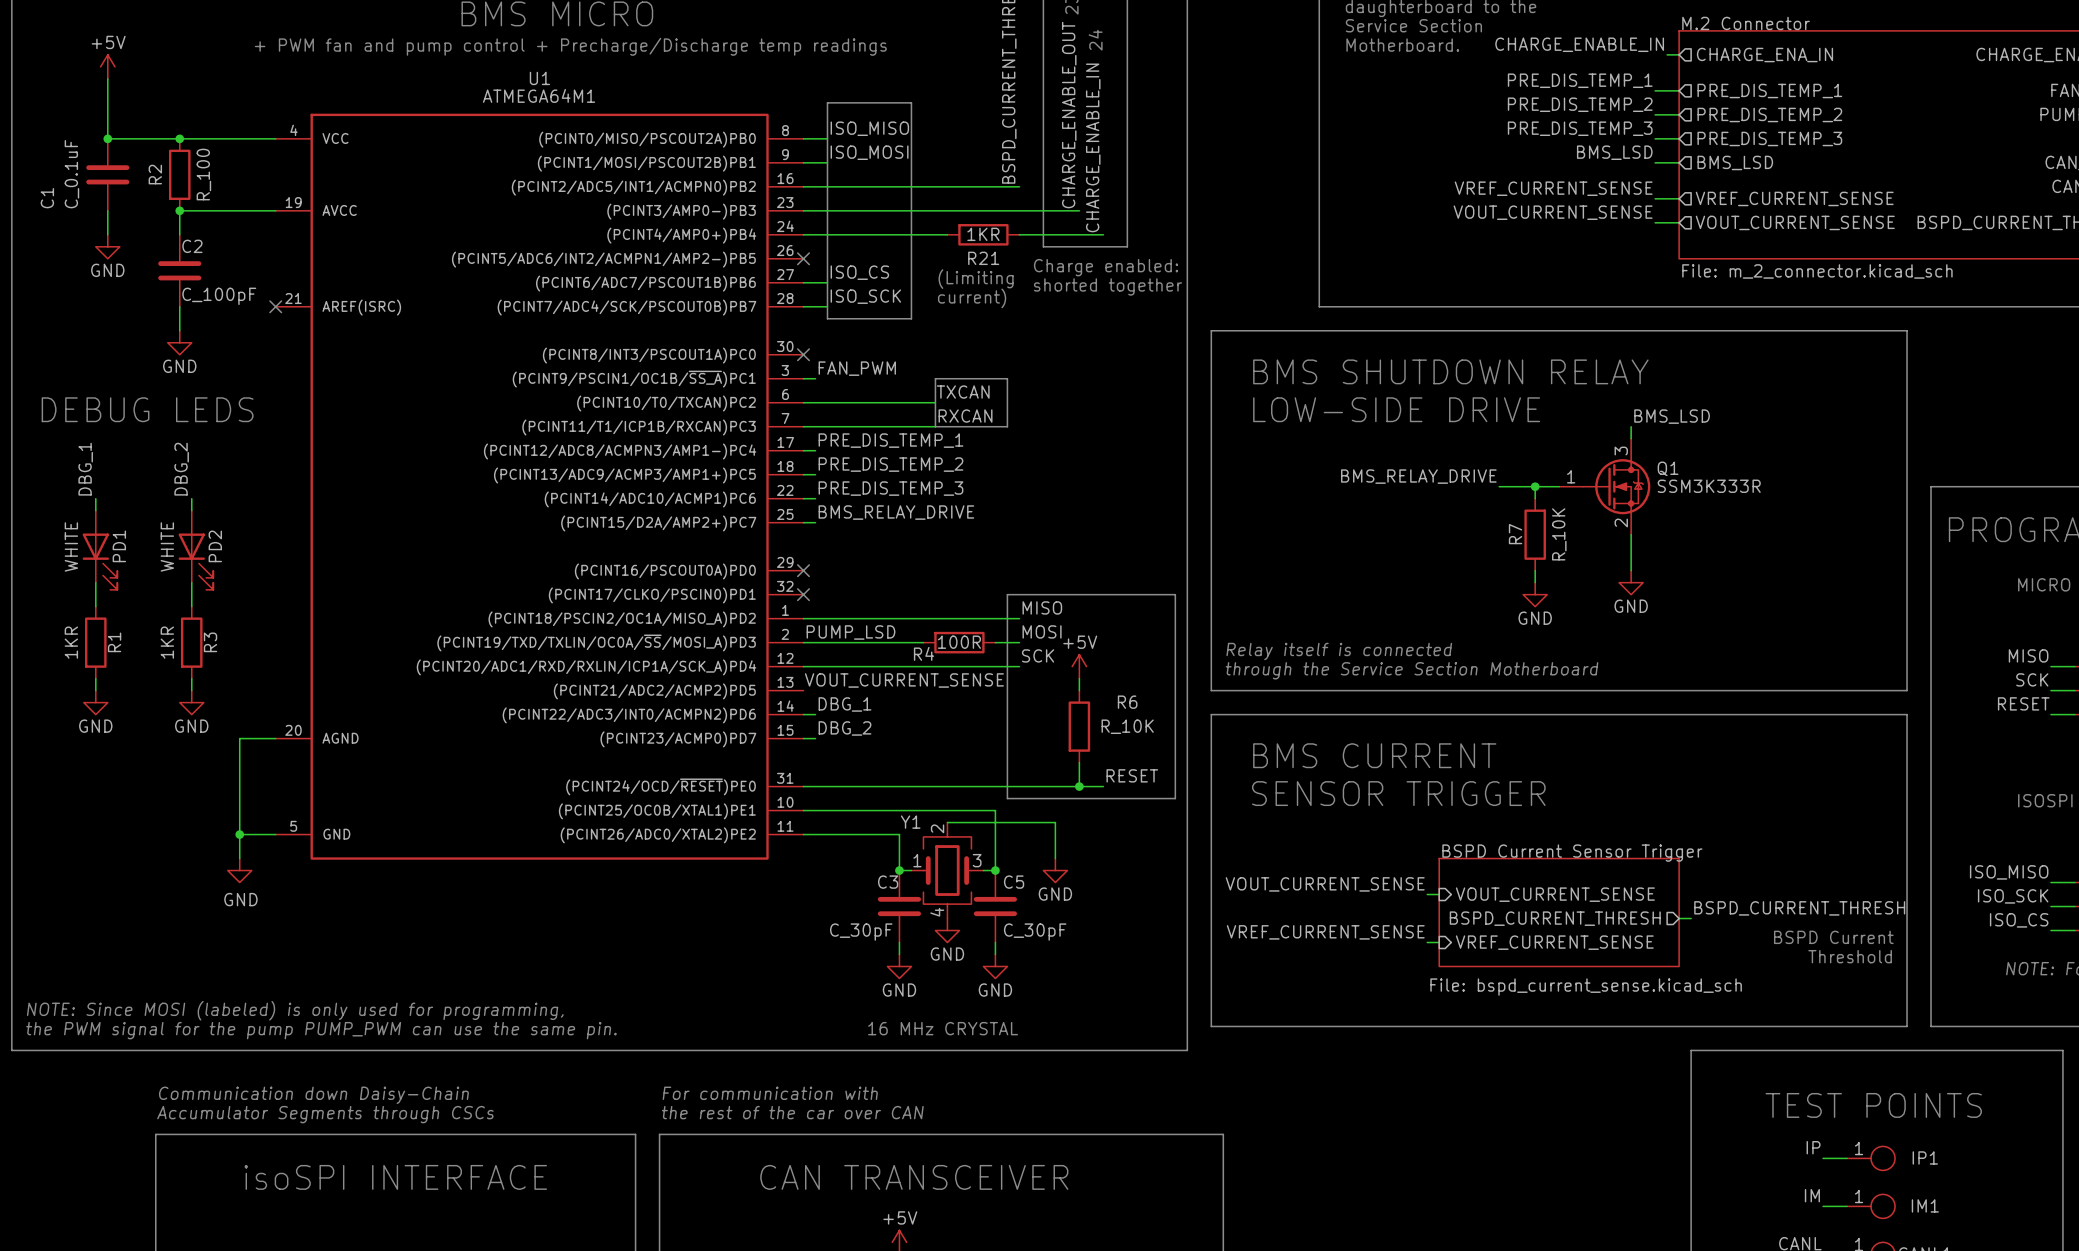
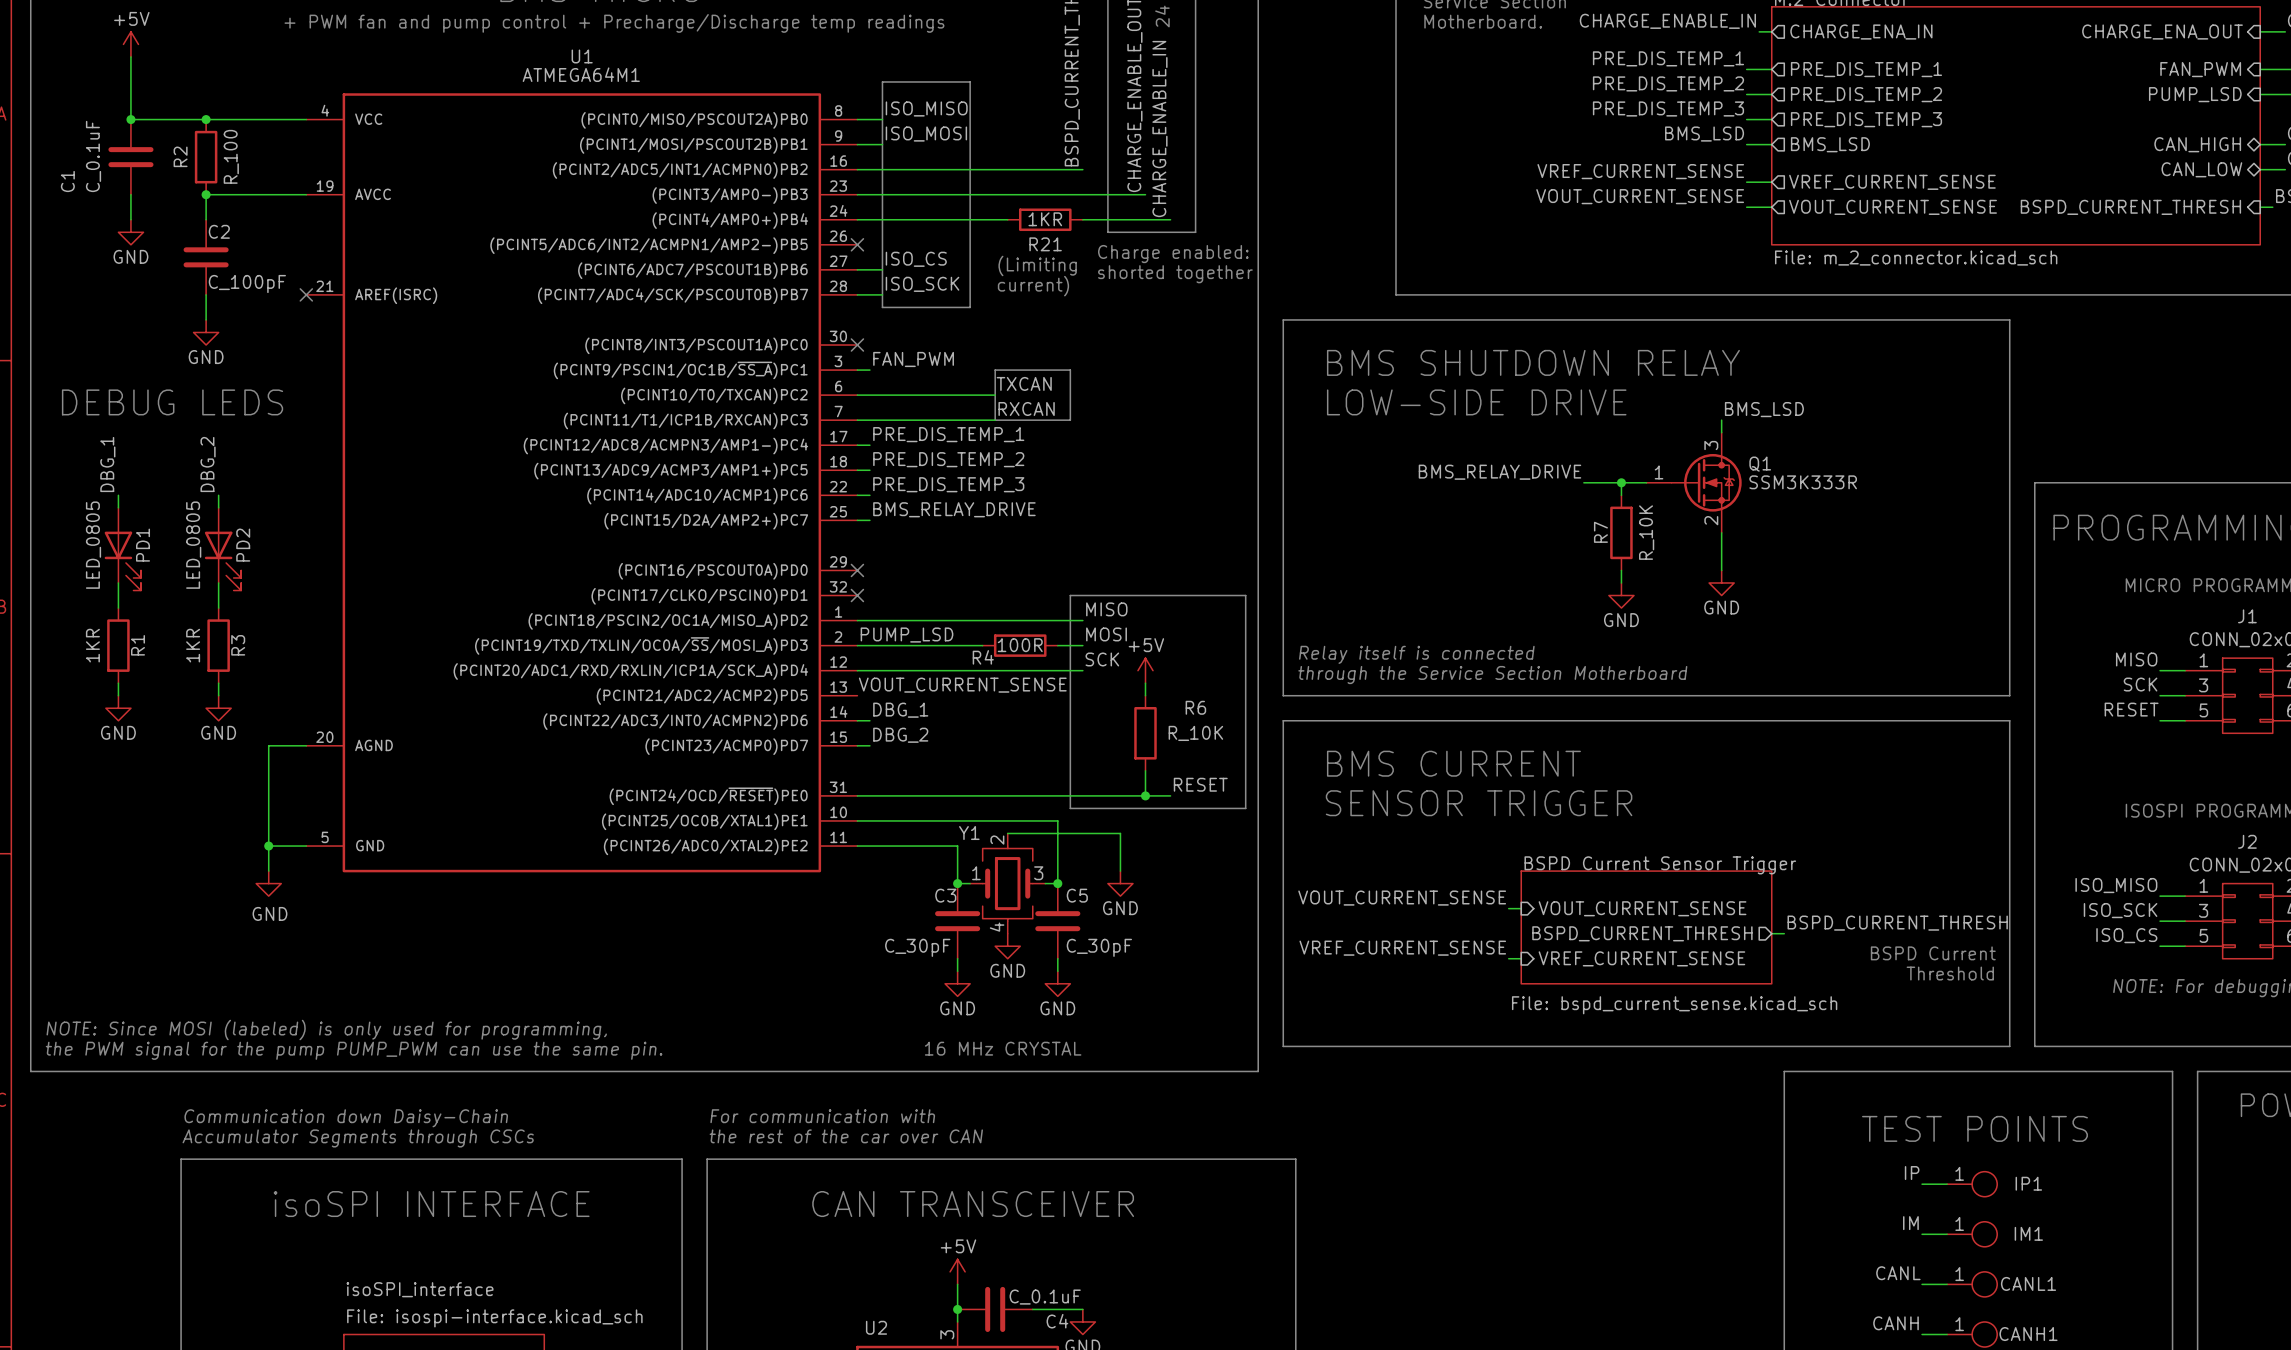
PD1 value: WHITE (71, 546) -> LED_0805 (93, 545)
PD2 value: WHITE (167, 546) -> LED_0805 (193, 545)

